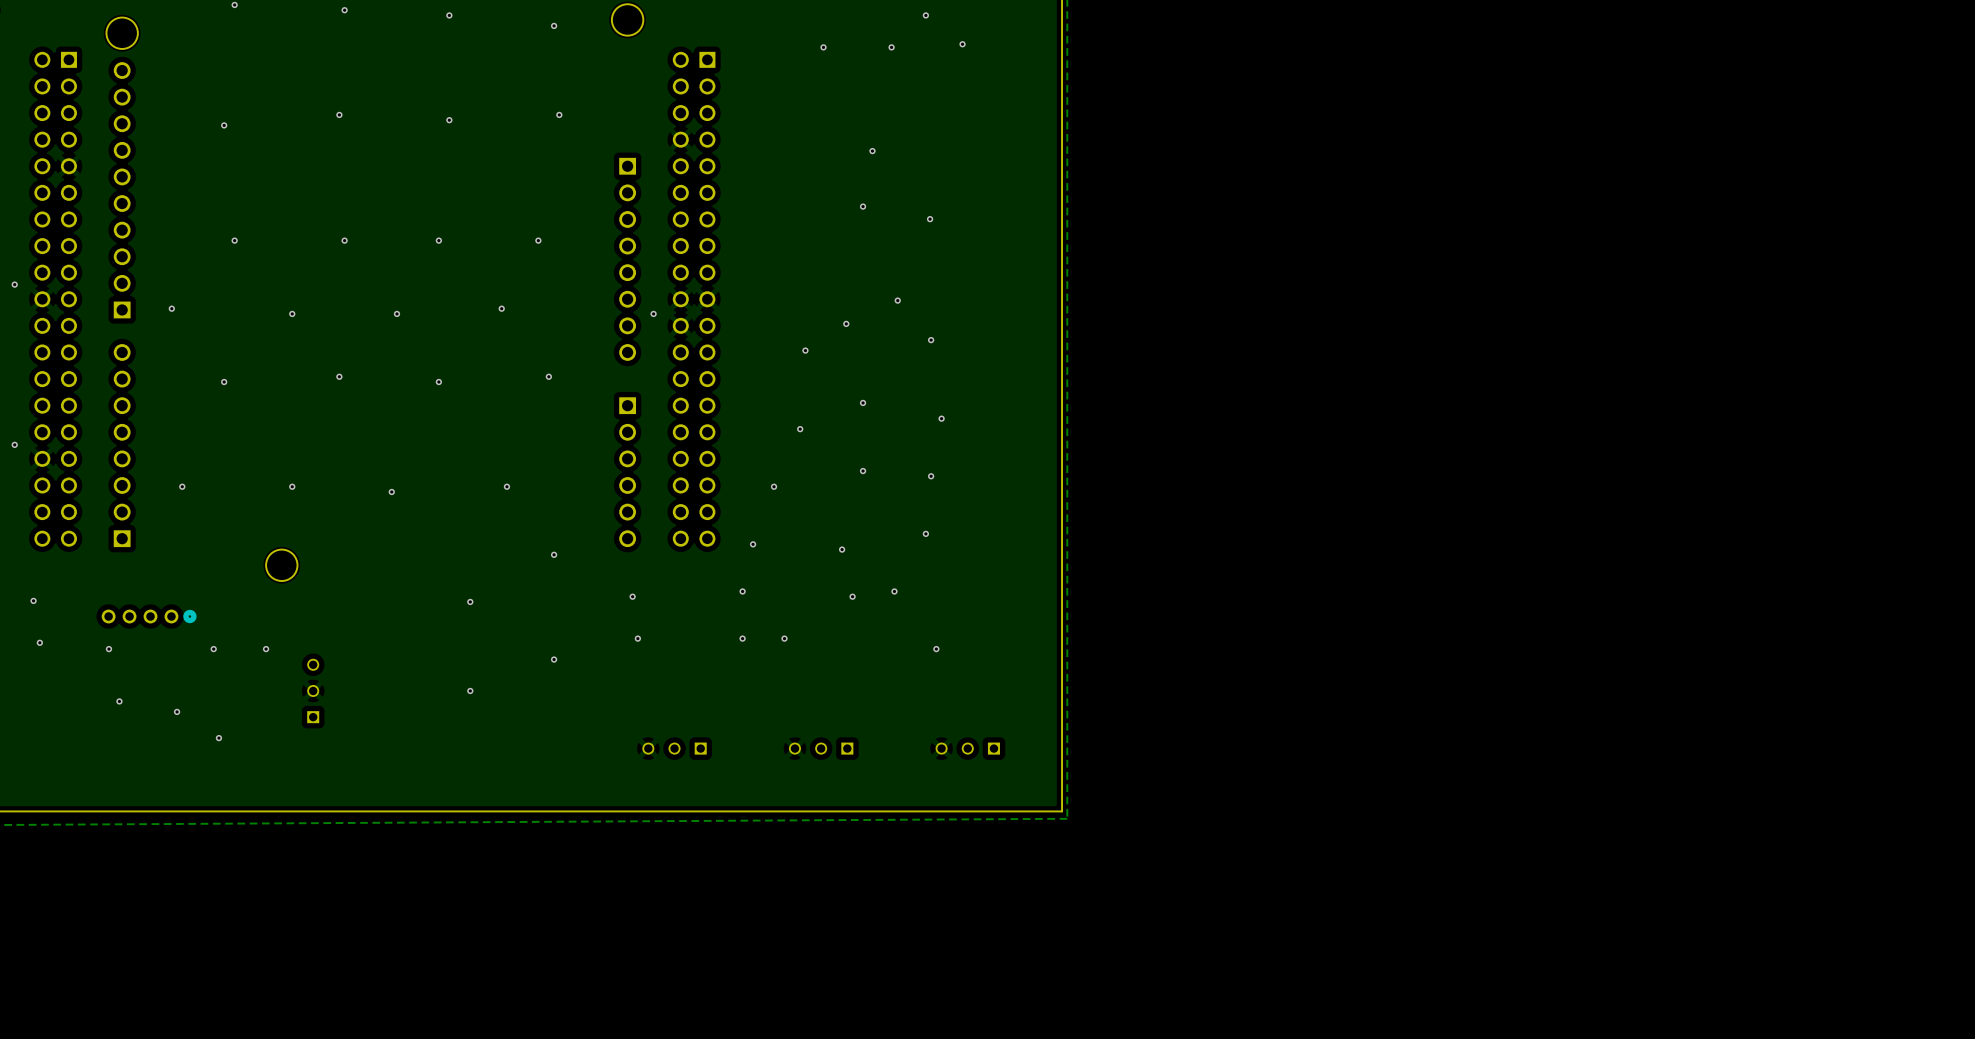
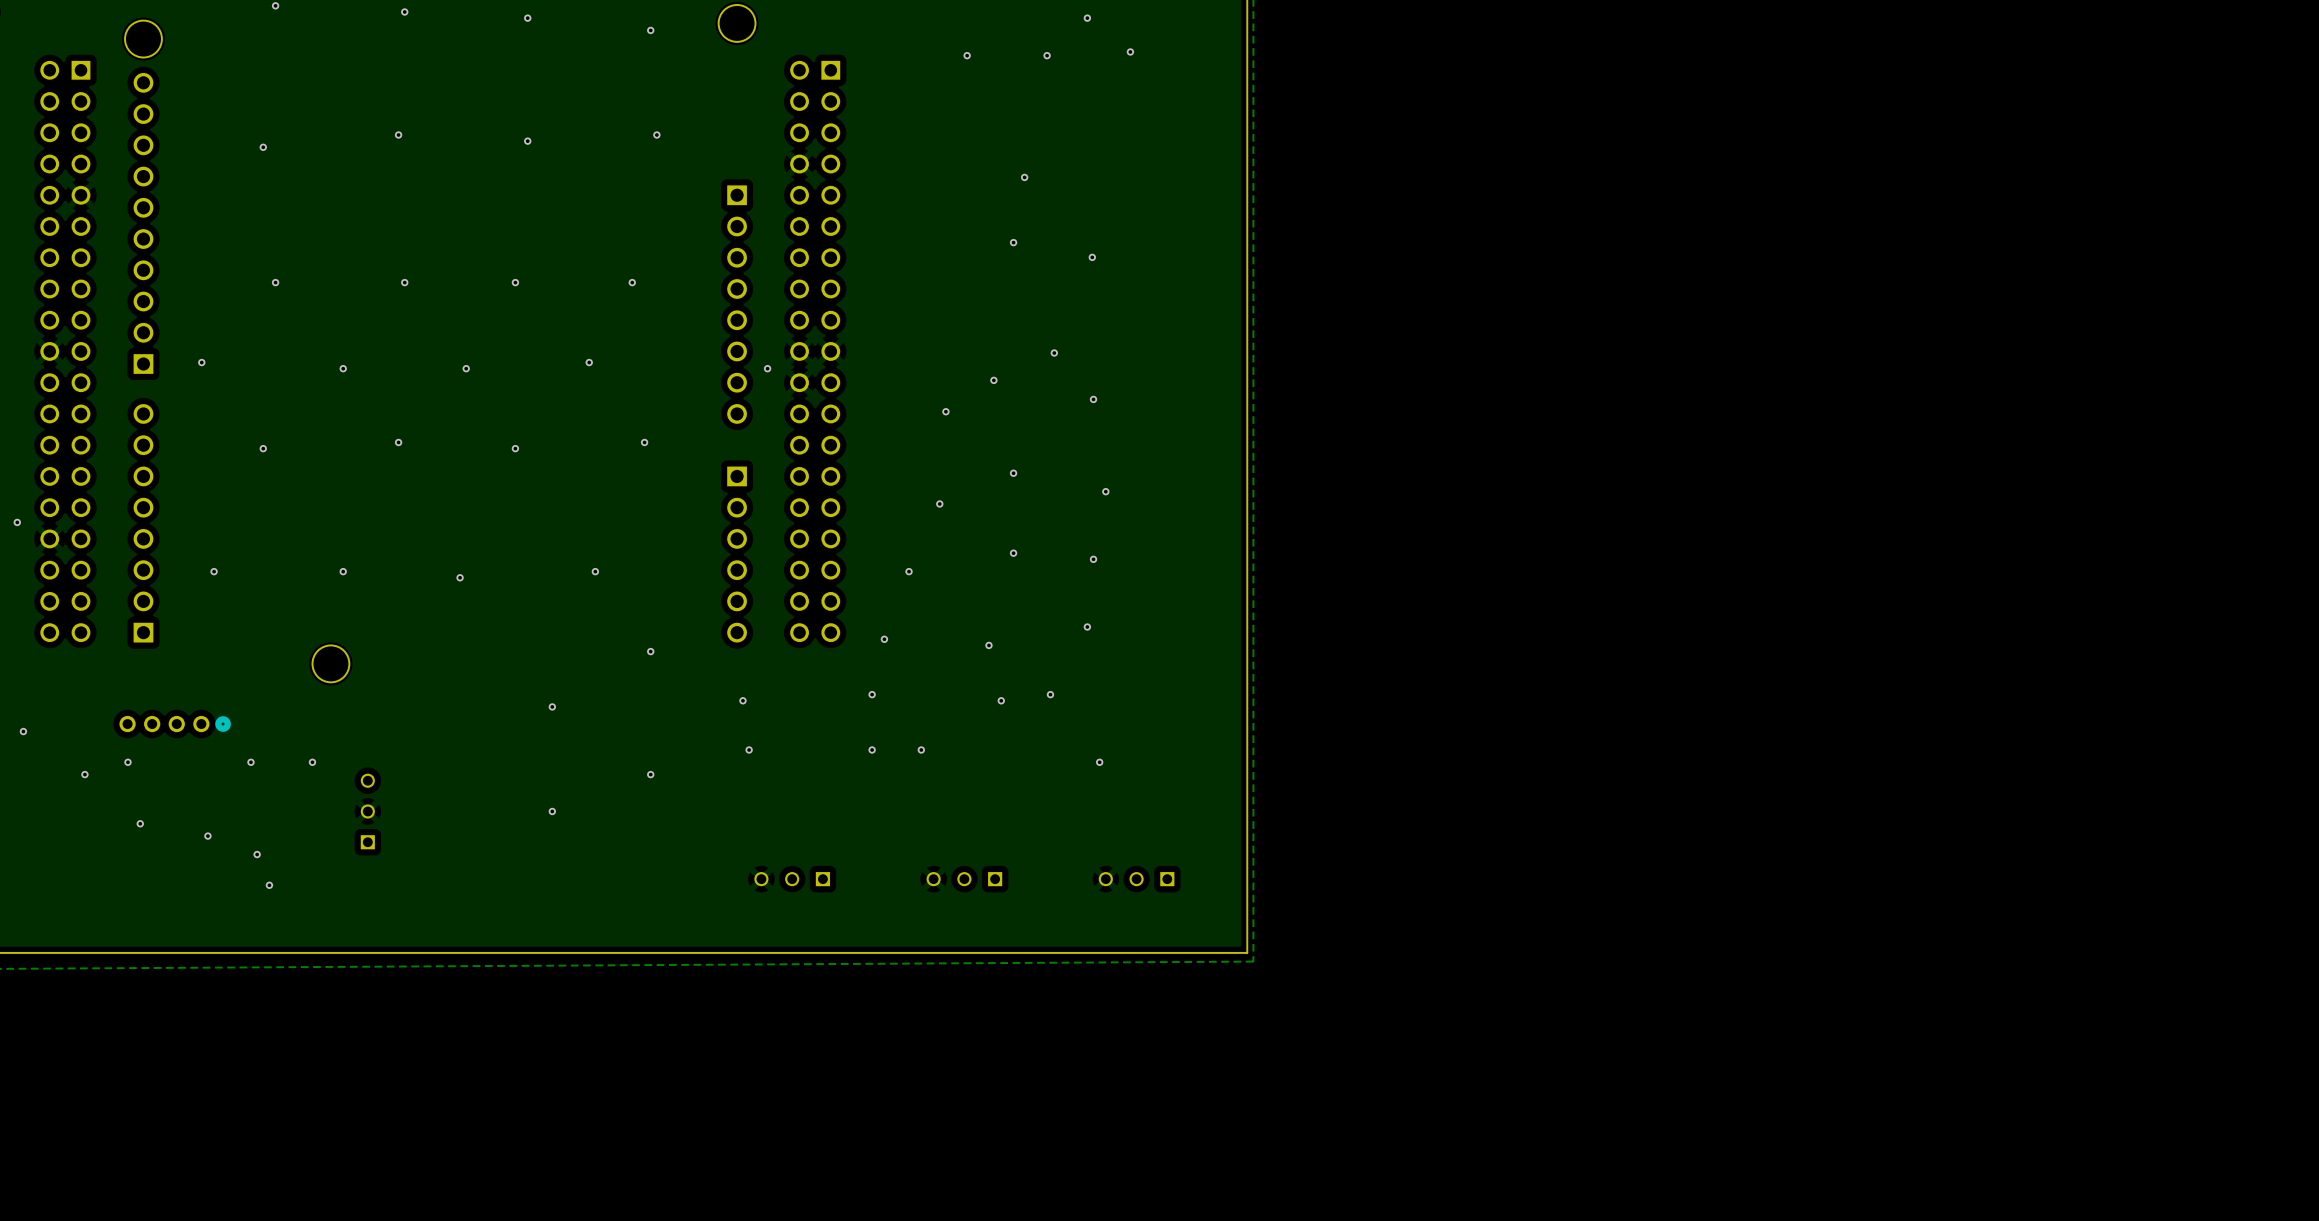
via: (14, 284) -> none
via: (33, 600) -> none
via: none -> (23, 731)
via: (39, 642) -> none
via: none -> (84, 774)
via: none -> (257, 854)
via: (218, 738) -> none
via: none -> (269, 885)

